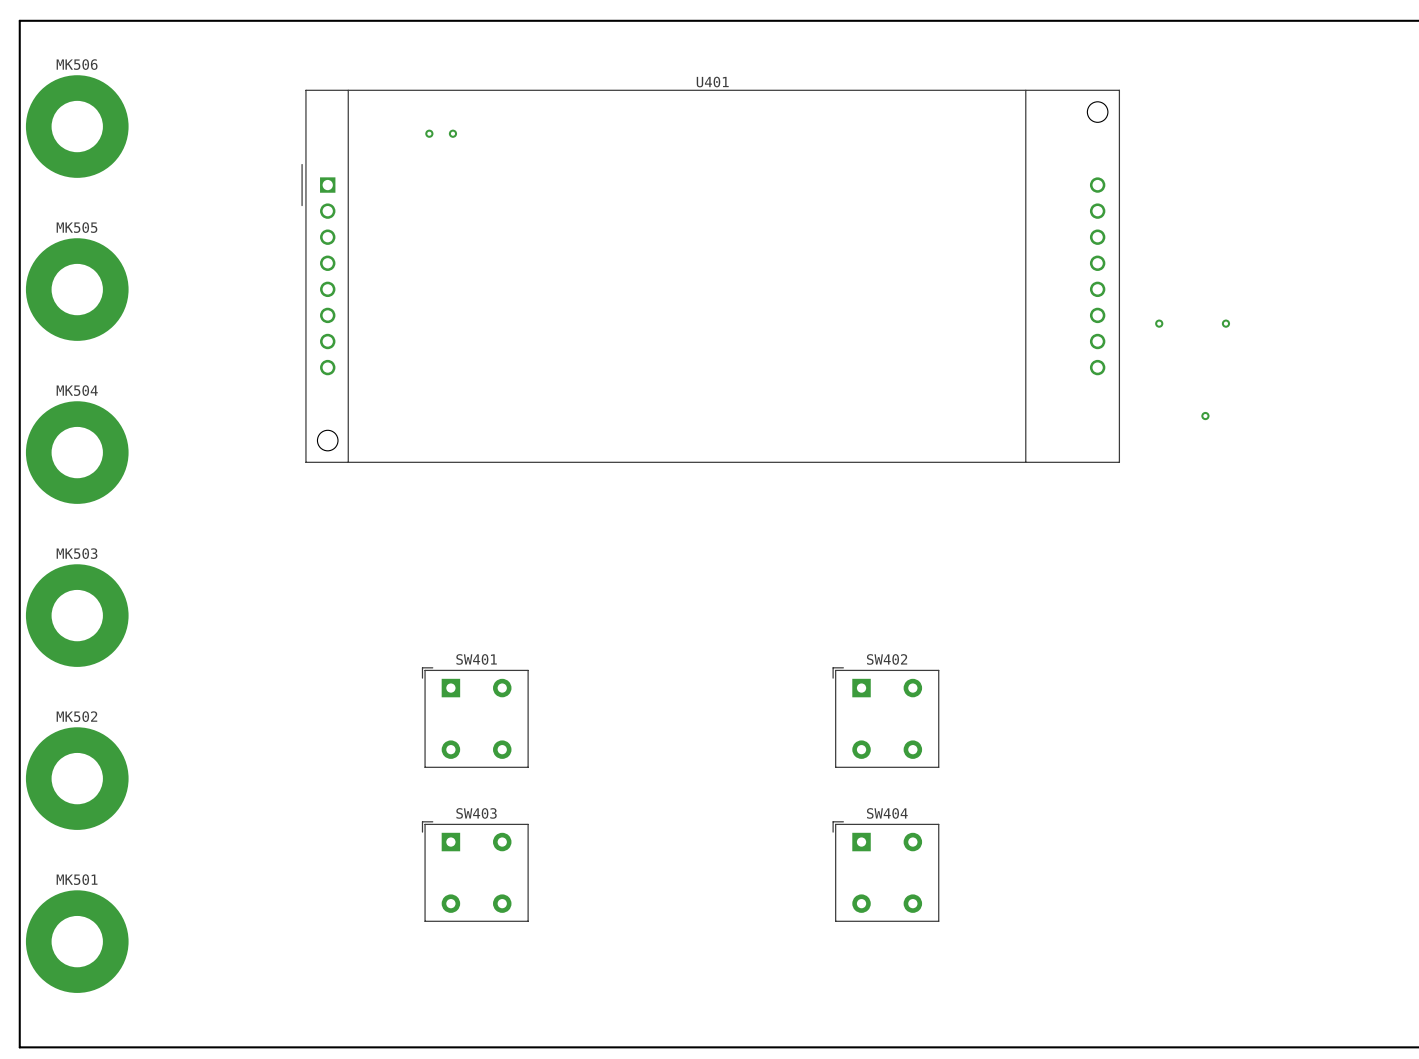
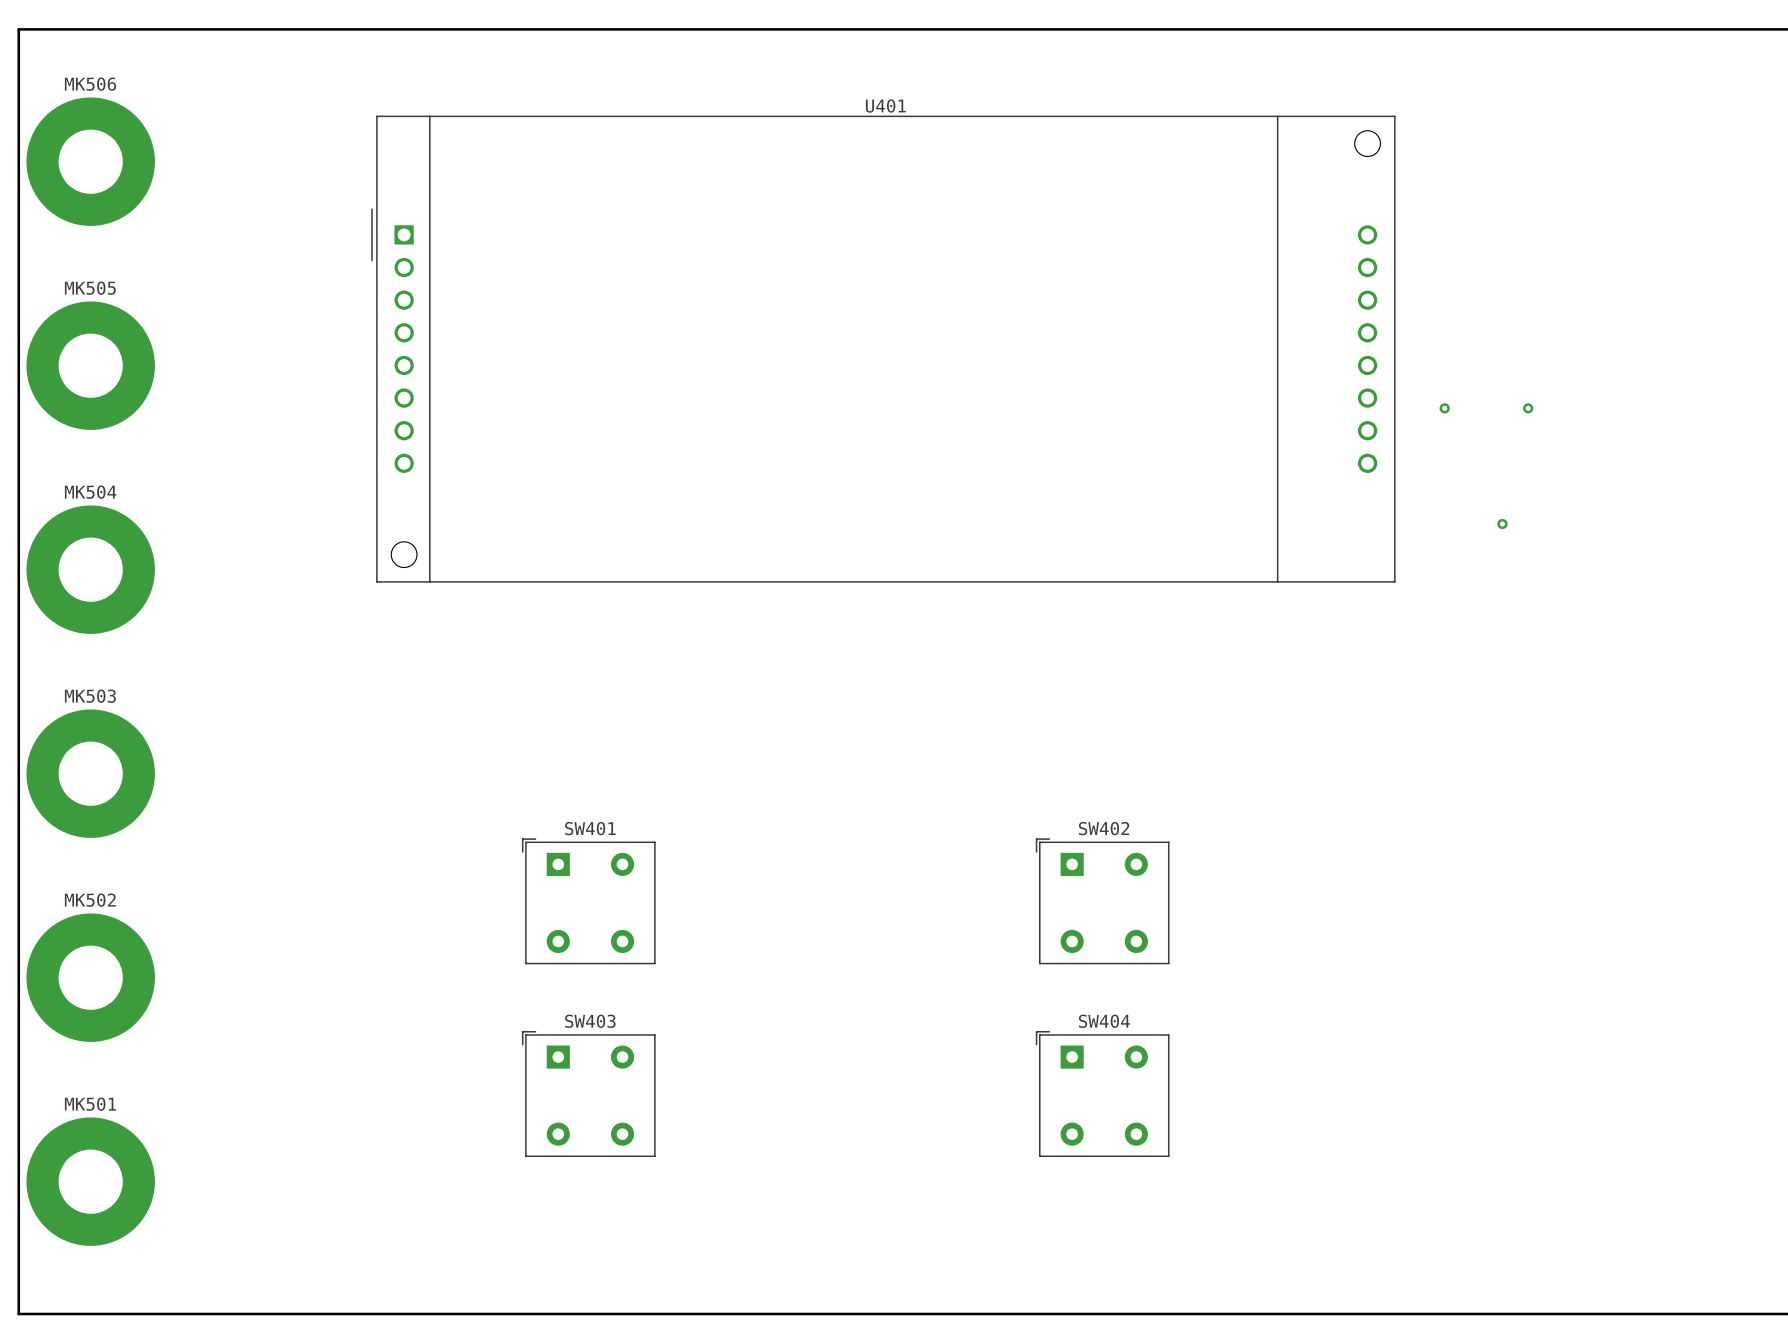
via: (429, 133) -> none
via: (452, 133) -> none

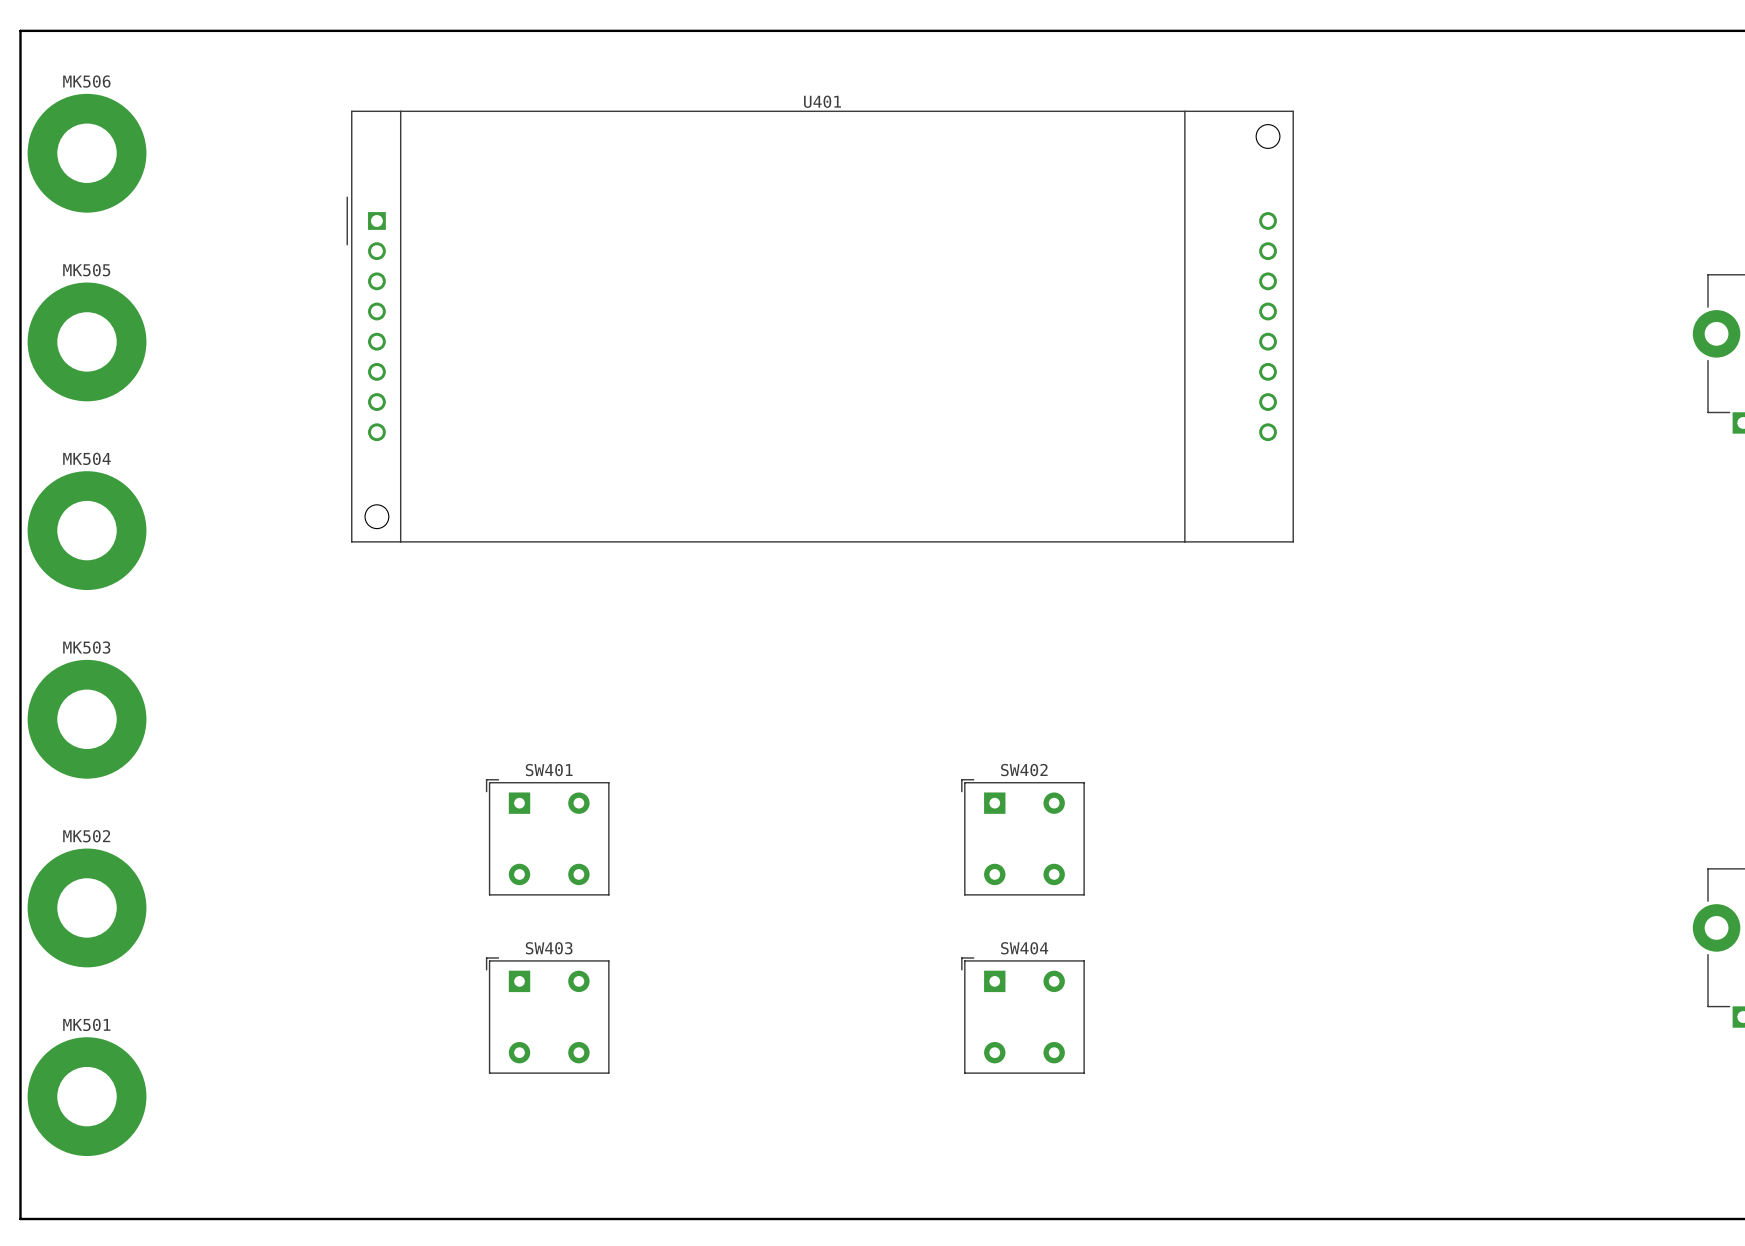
via: (1444, 408) -> none
via: (1528, 408) -> none
via: (1502, 523) -> none

